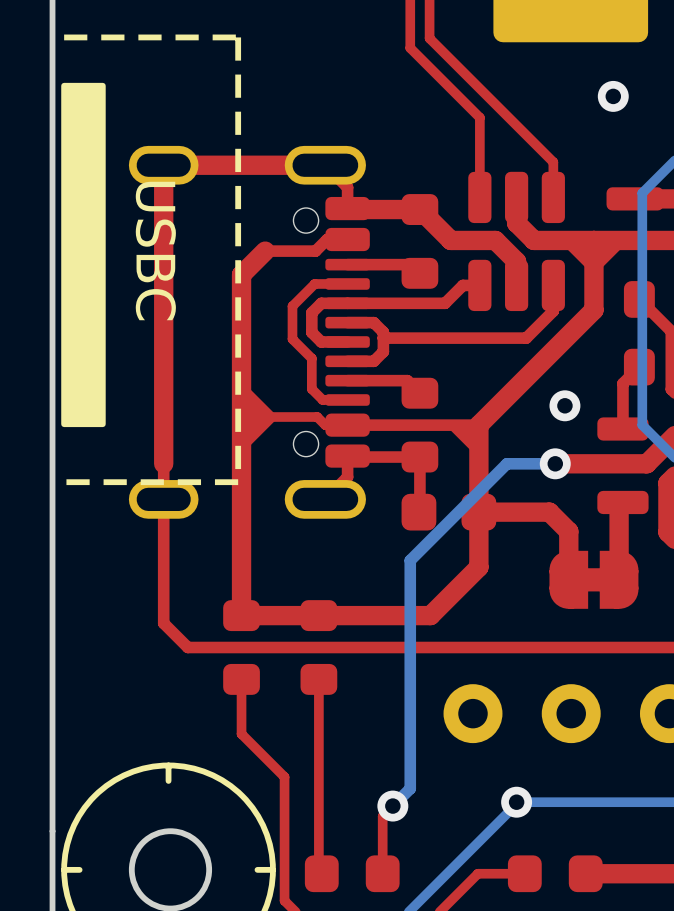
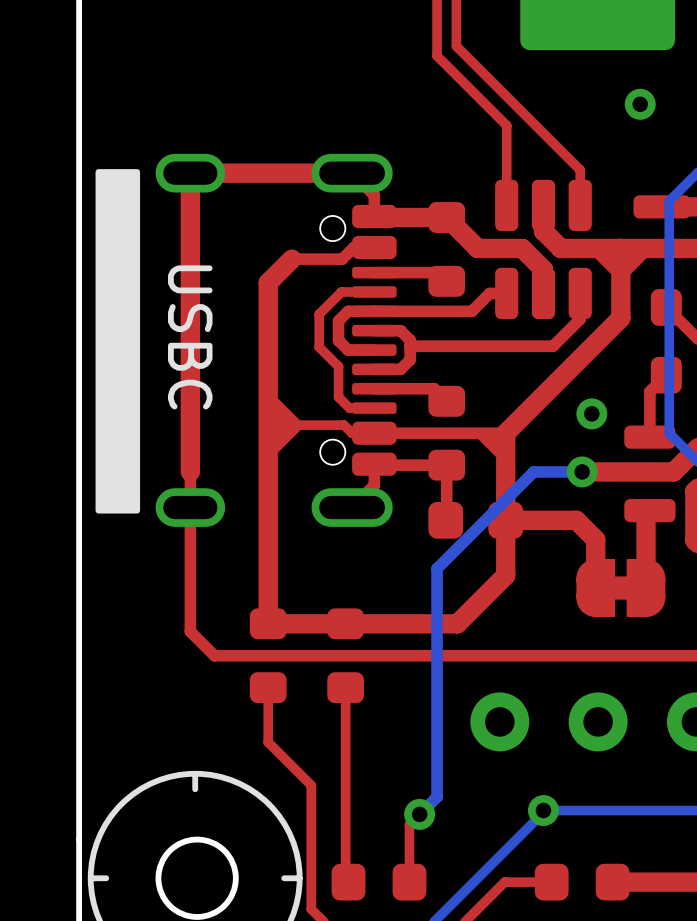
line: (64, 37) (238, 37) (238, 482) (64, 482) -> none
text position: USBC (155, 251) -> USBC (190, 337)
drawing position: (83, 254) -> (117, 341)

